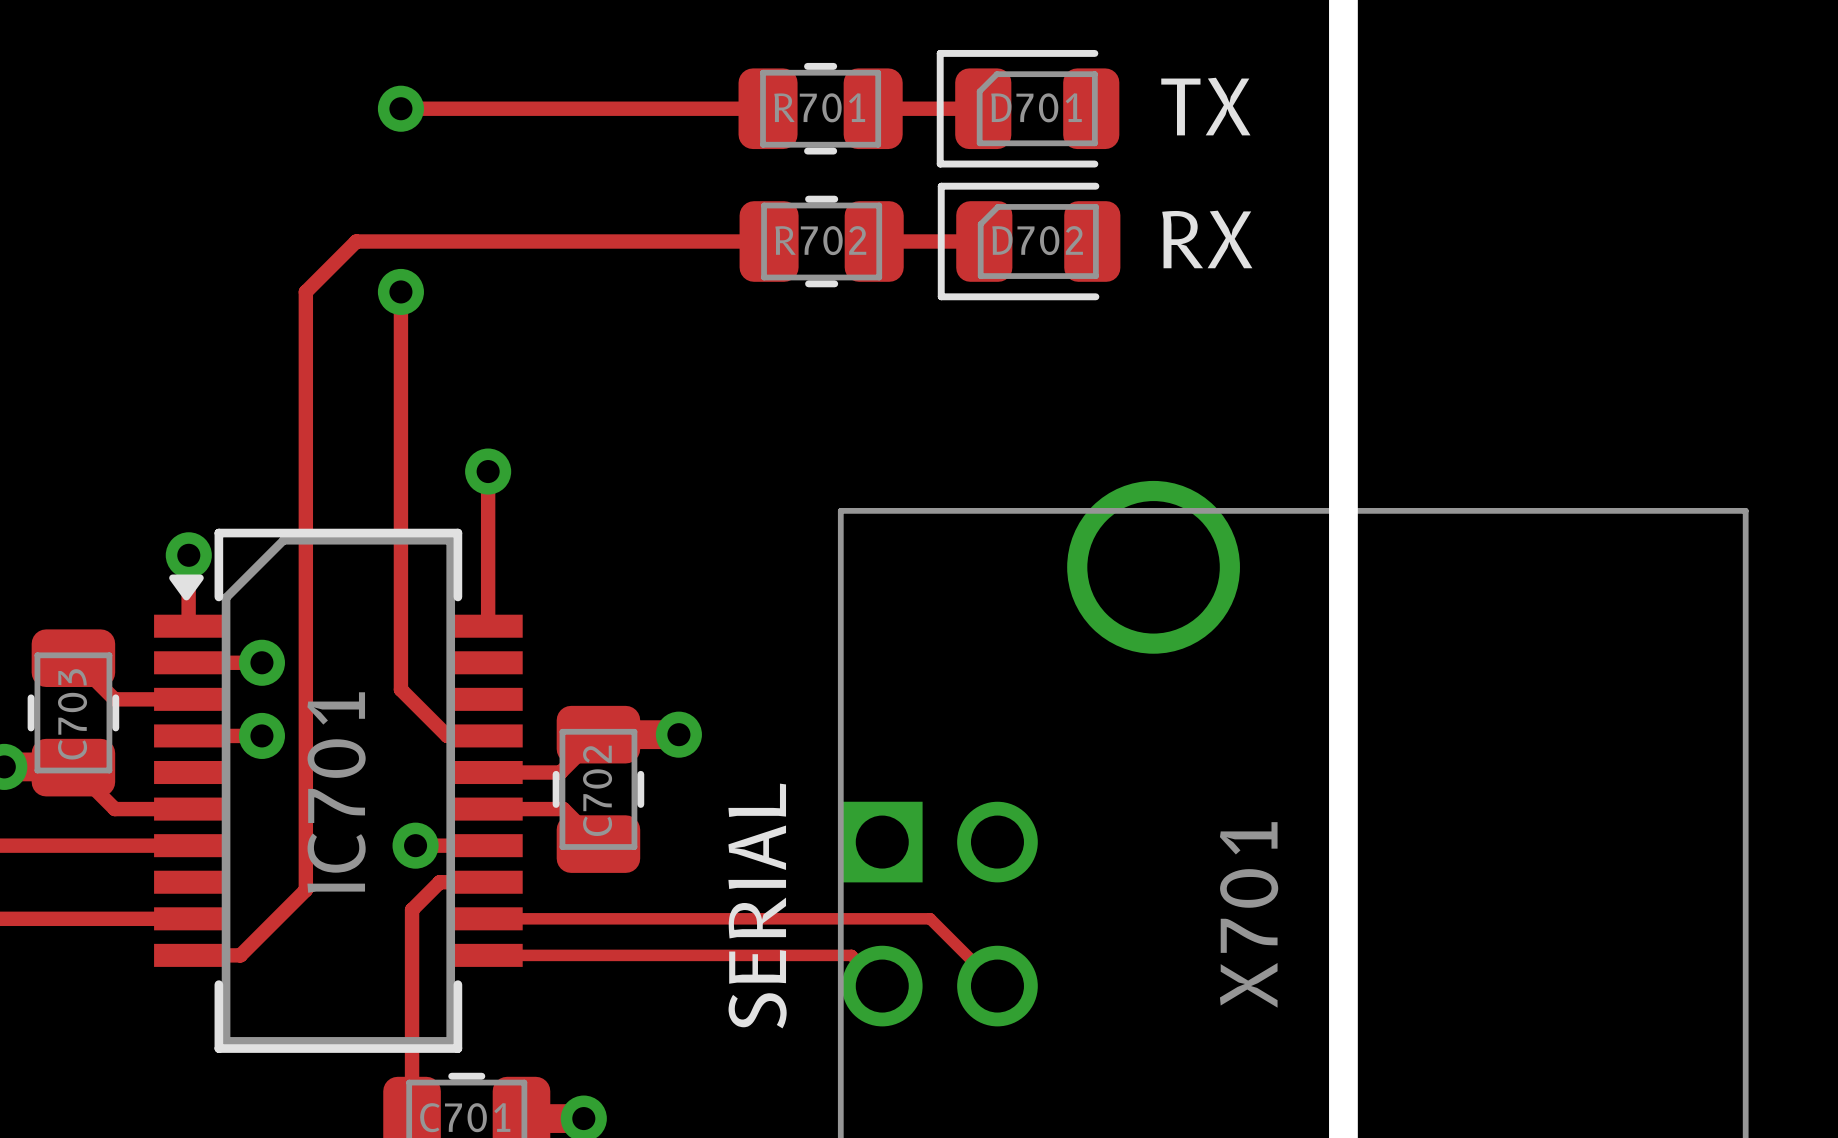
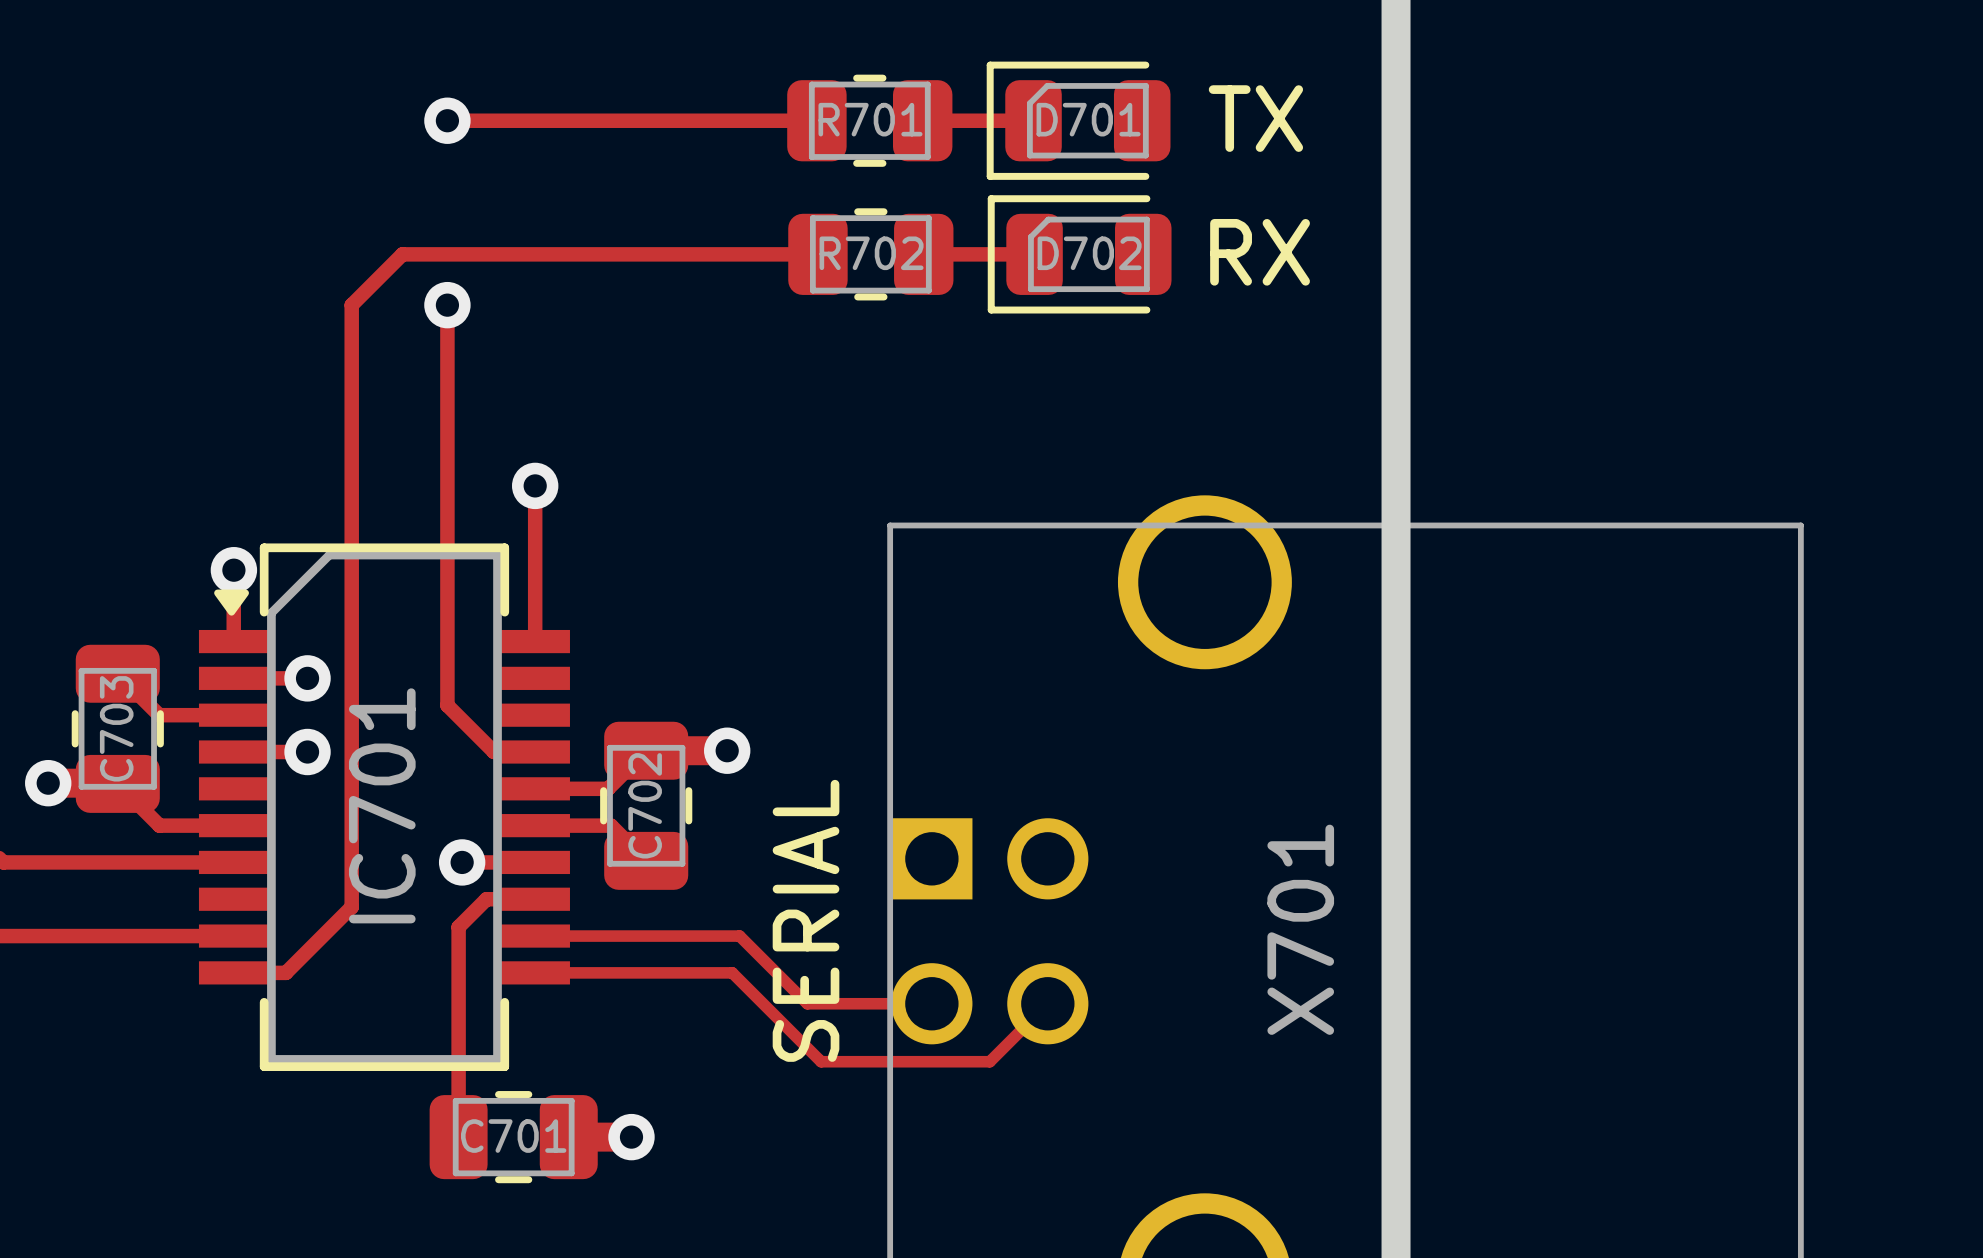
track: (691, 918) (930, 918) (997, 986) -> (732, 972) (821, 1061) (989, 1061) (1047, 1003)
track: (683, 955) (851, 955) (882, 986) -> (739, 936) (807, 1003) (931, 1003)

